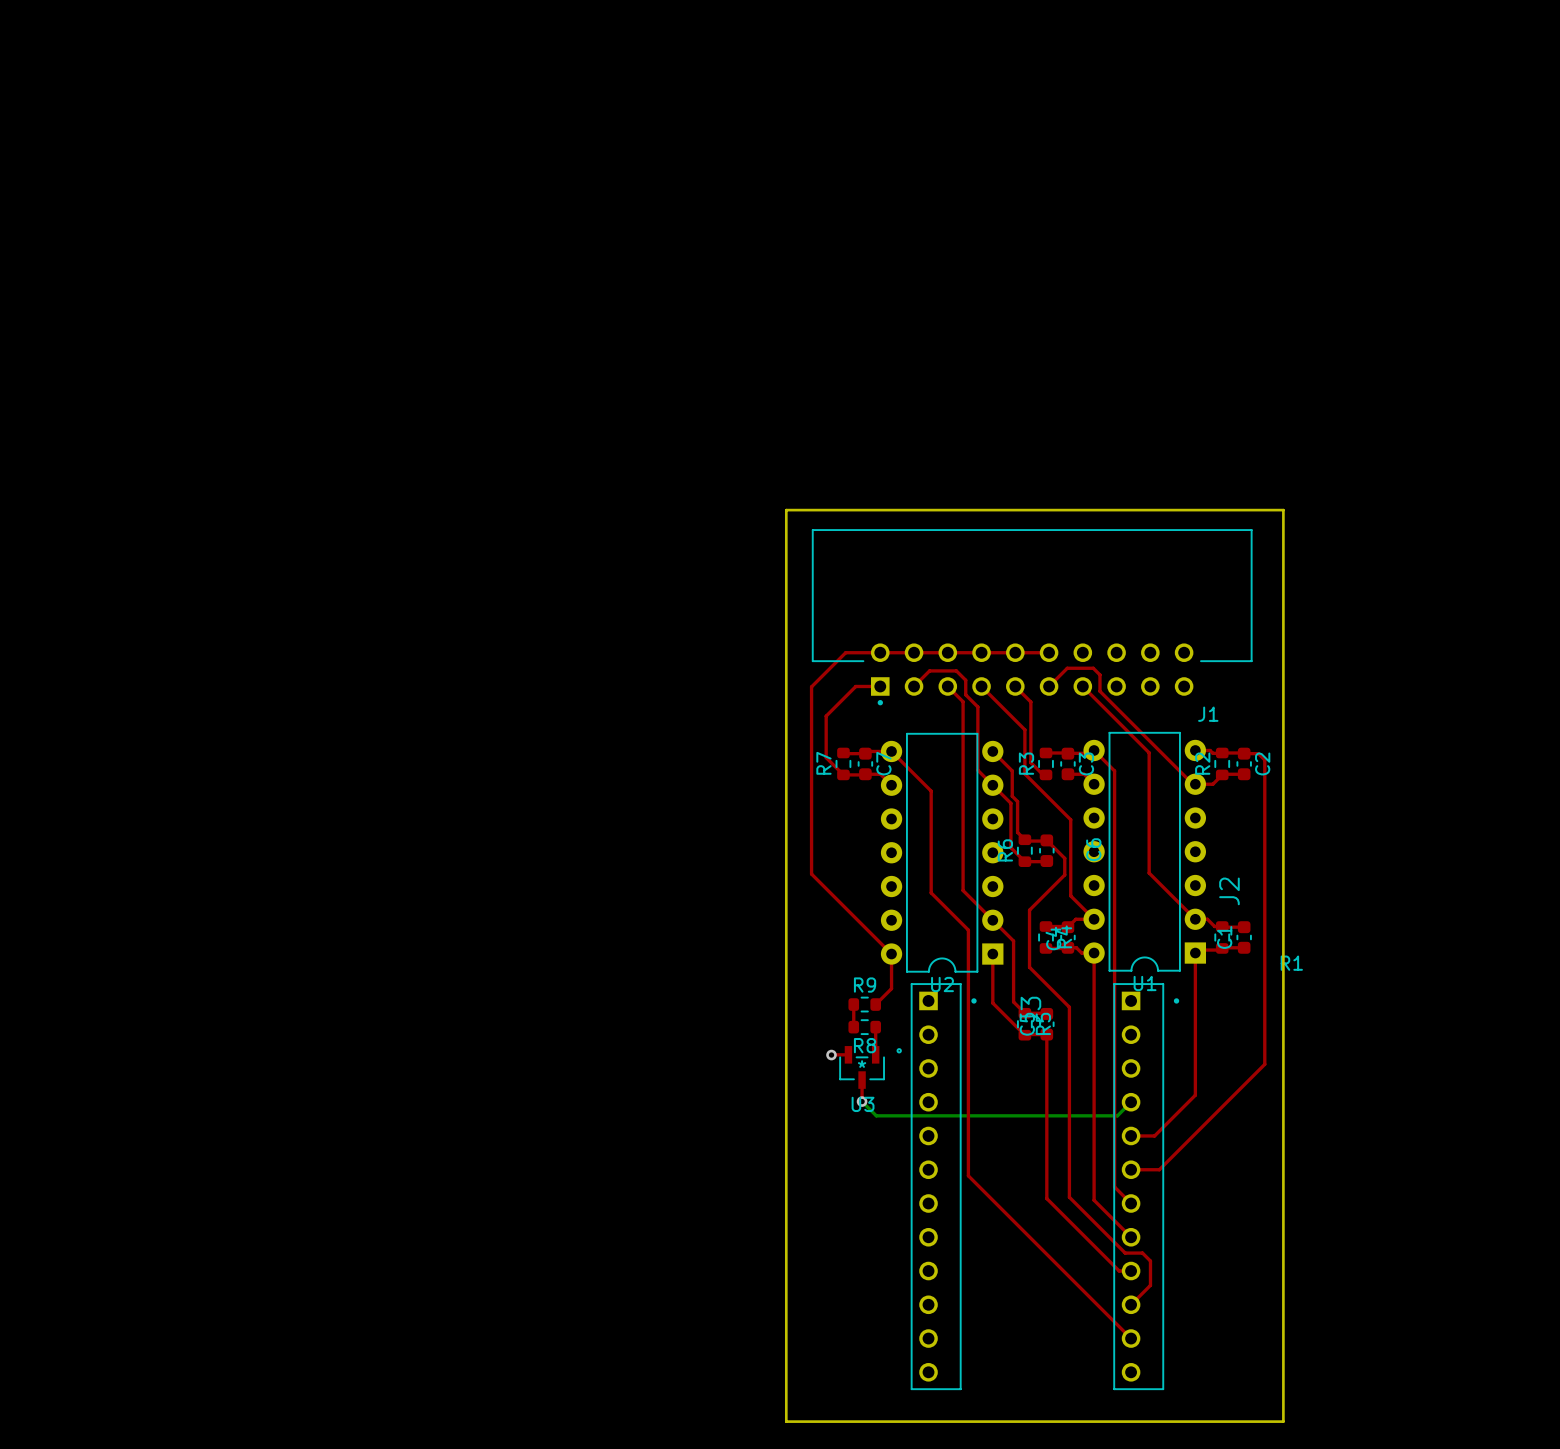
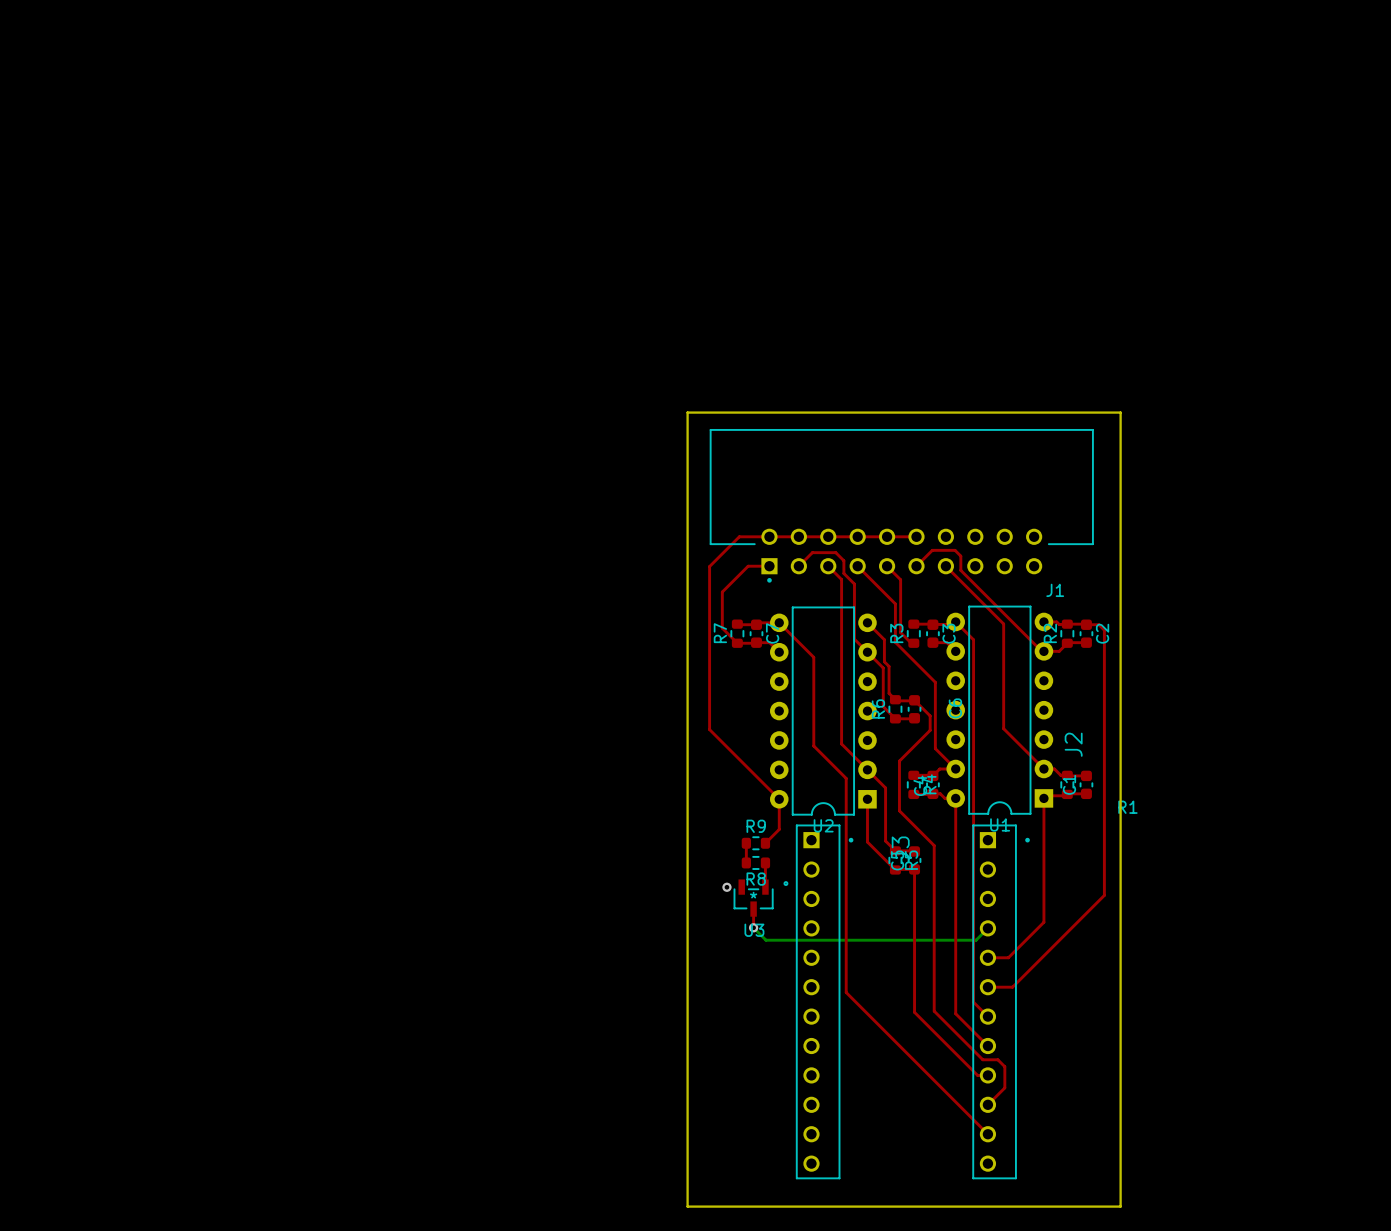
top track: (848, 1054) (831, 1055) -> none

